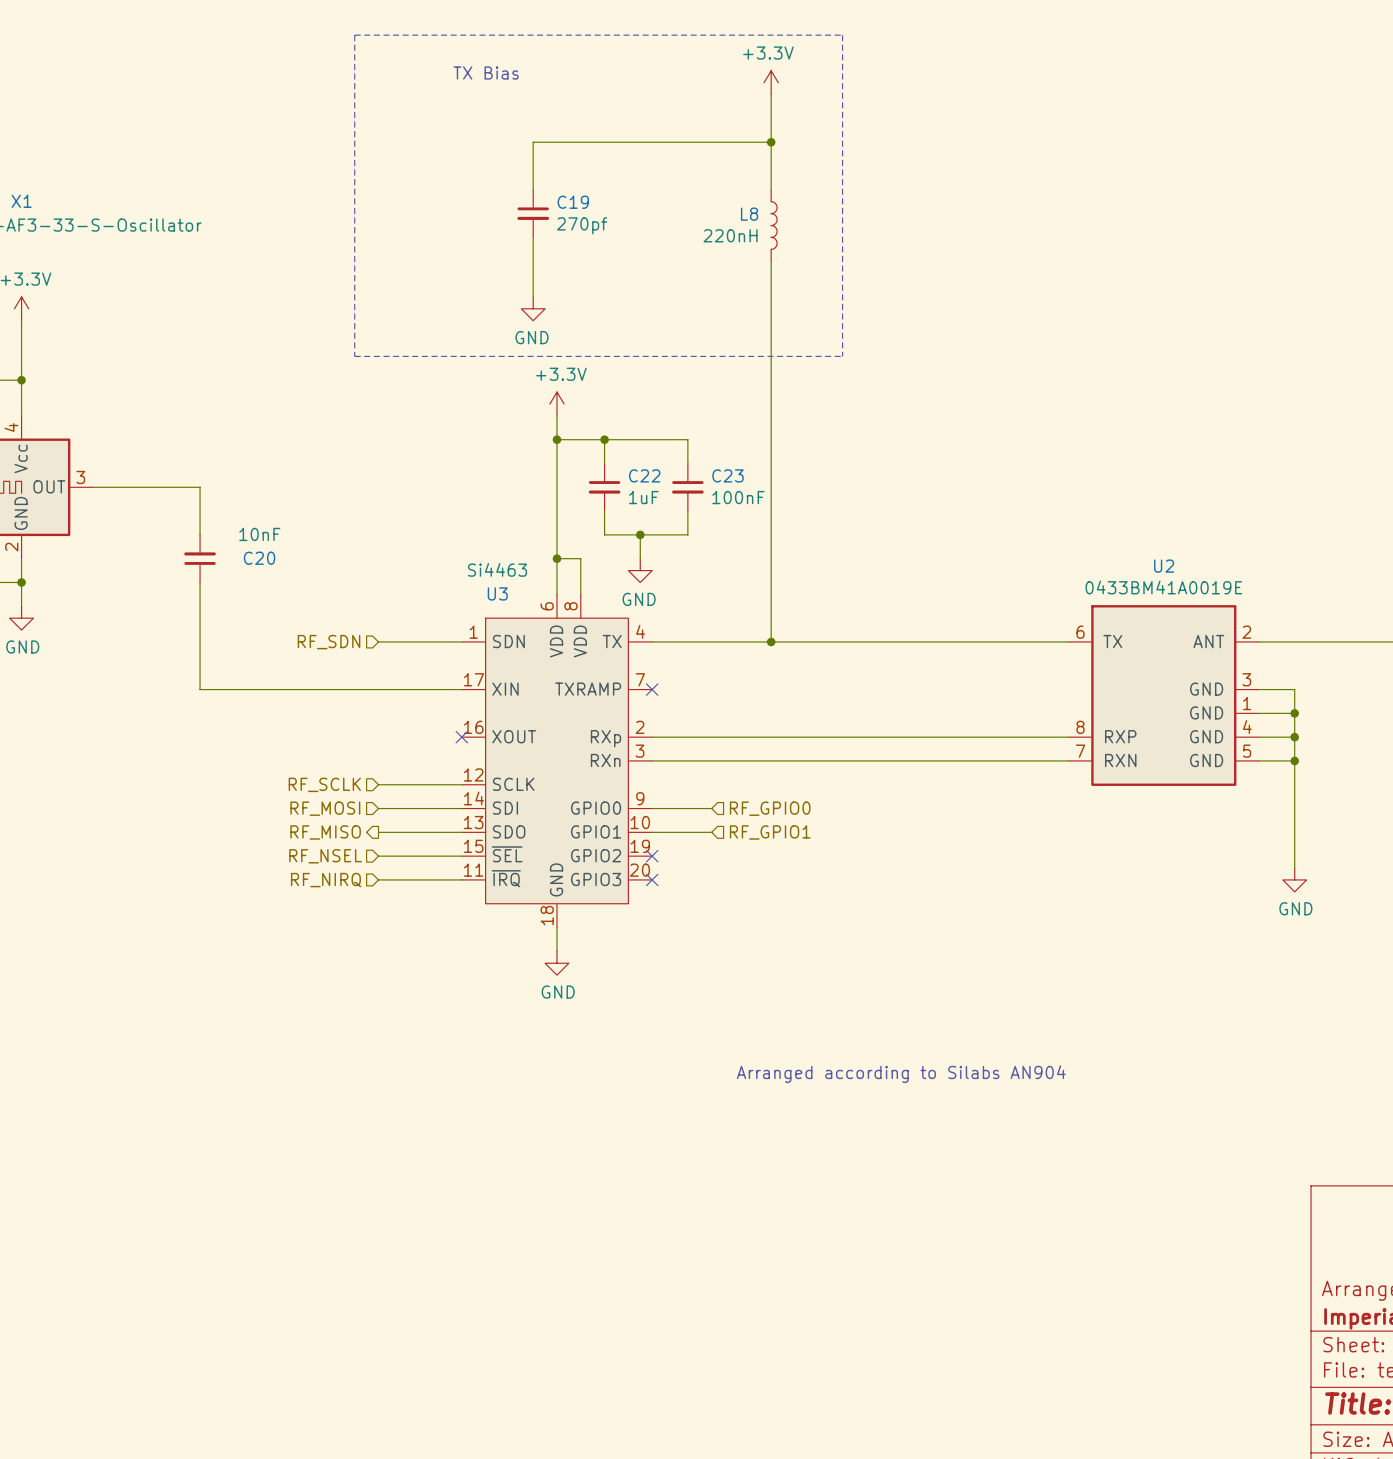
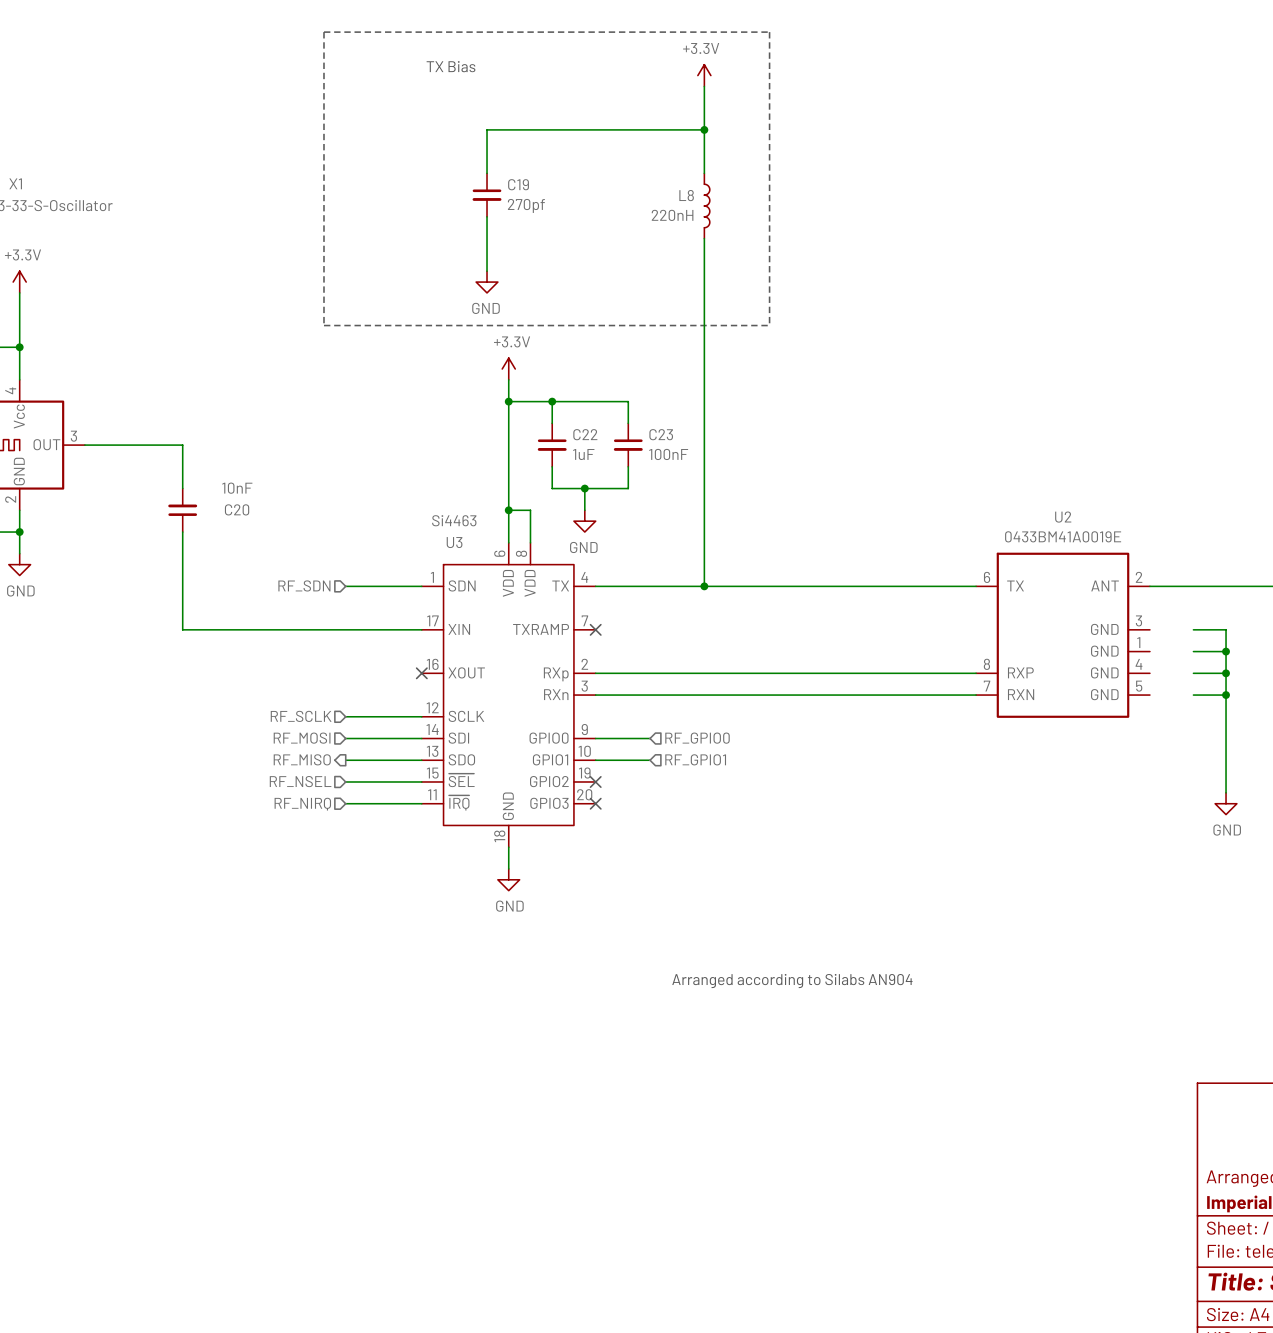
wire: (1259, 689) (1294, 689) (1294, 868) -> (1193, 629) (1226, 629) (1226, 792)
wire: (1259, 713) (1294, 713) -> (1193, 651) (1226, 651)
junction: (1294, 713) -> none
junction: none -> (1226, 651)
wire: (1259, 737) (1294, 737) -> (1193, 673) (1226, 673)
junction: (1294, 737) -> none
junction: none -> (1226, 673)
wire: (1259, 760) (1294, 760) -> (1193, 695) (1226, 695)
junction: (1294, 760) -> none
junction: none -> (1226, 695)
power symbol position: GND (1294, 879) -> GND (1226, 803)

